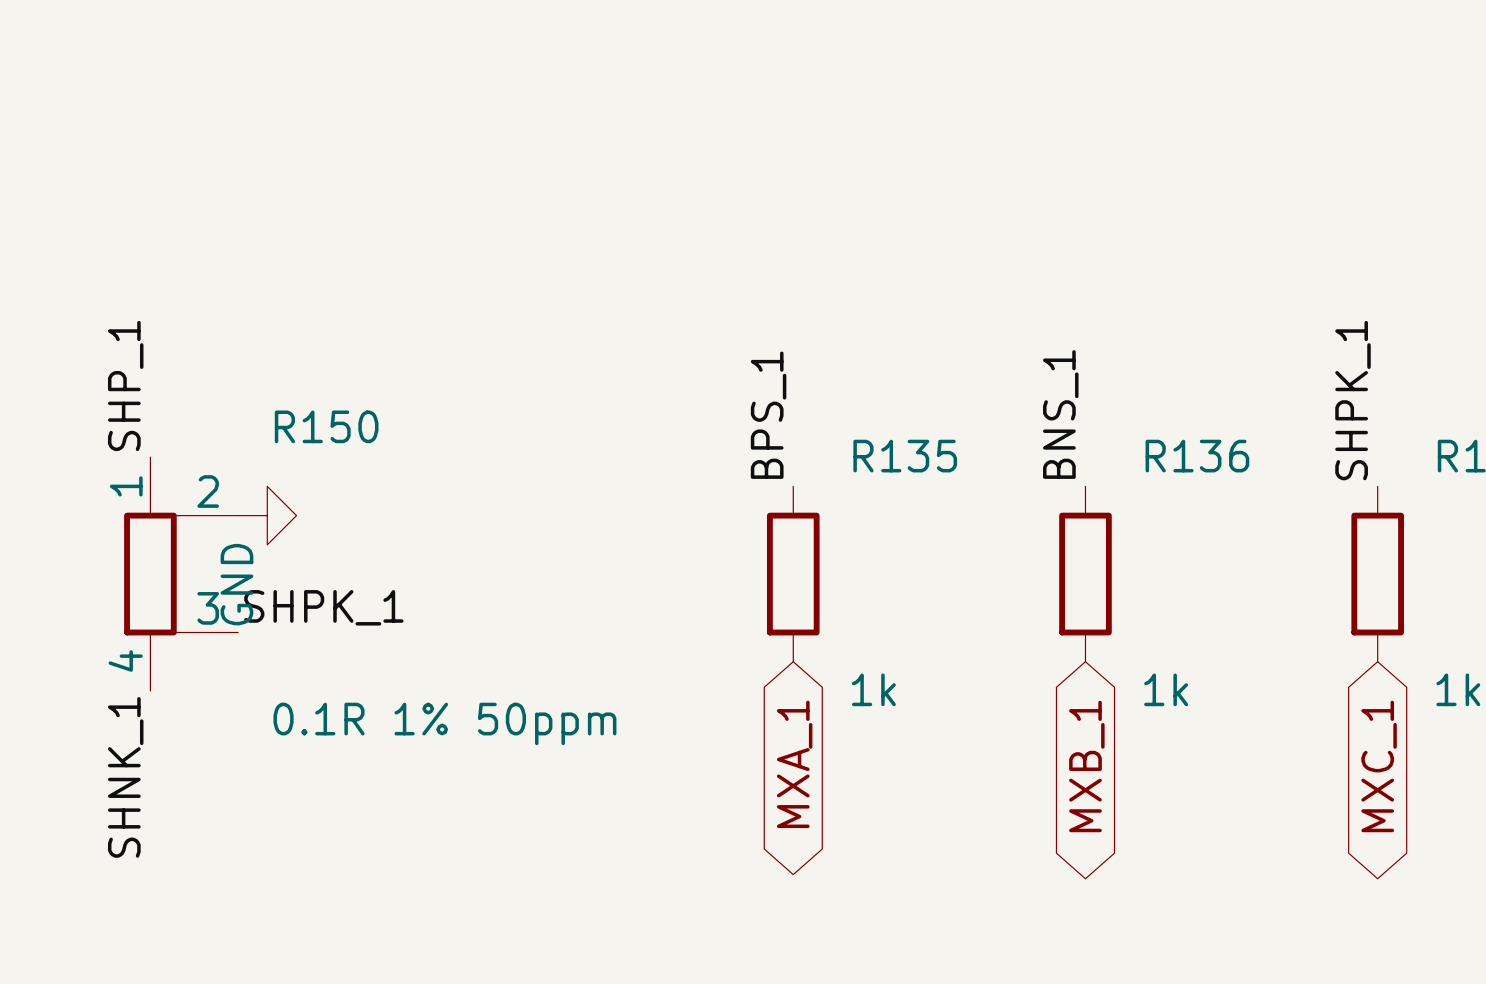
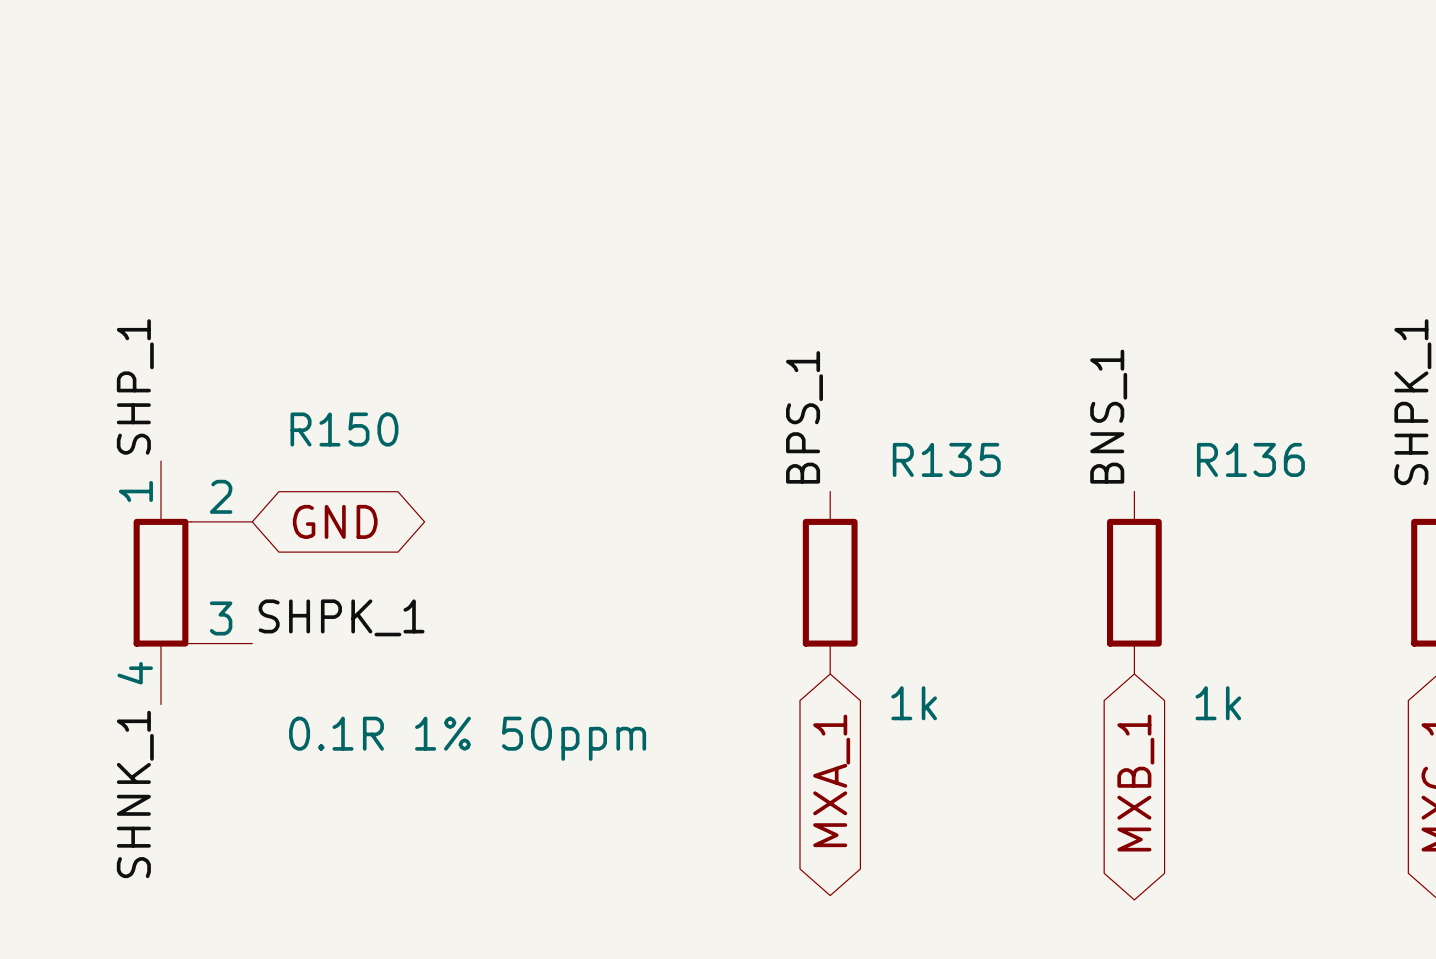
power symbol: GND (267, 515) -> none
global label: none -> GND (335, 521)

